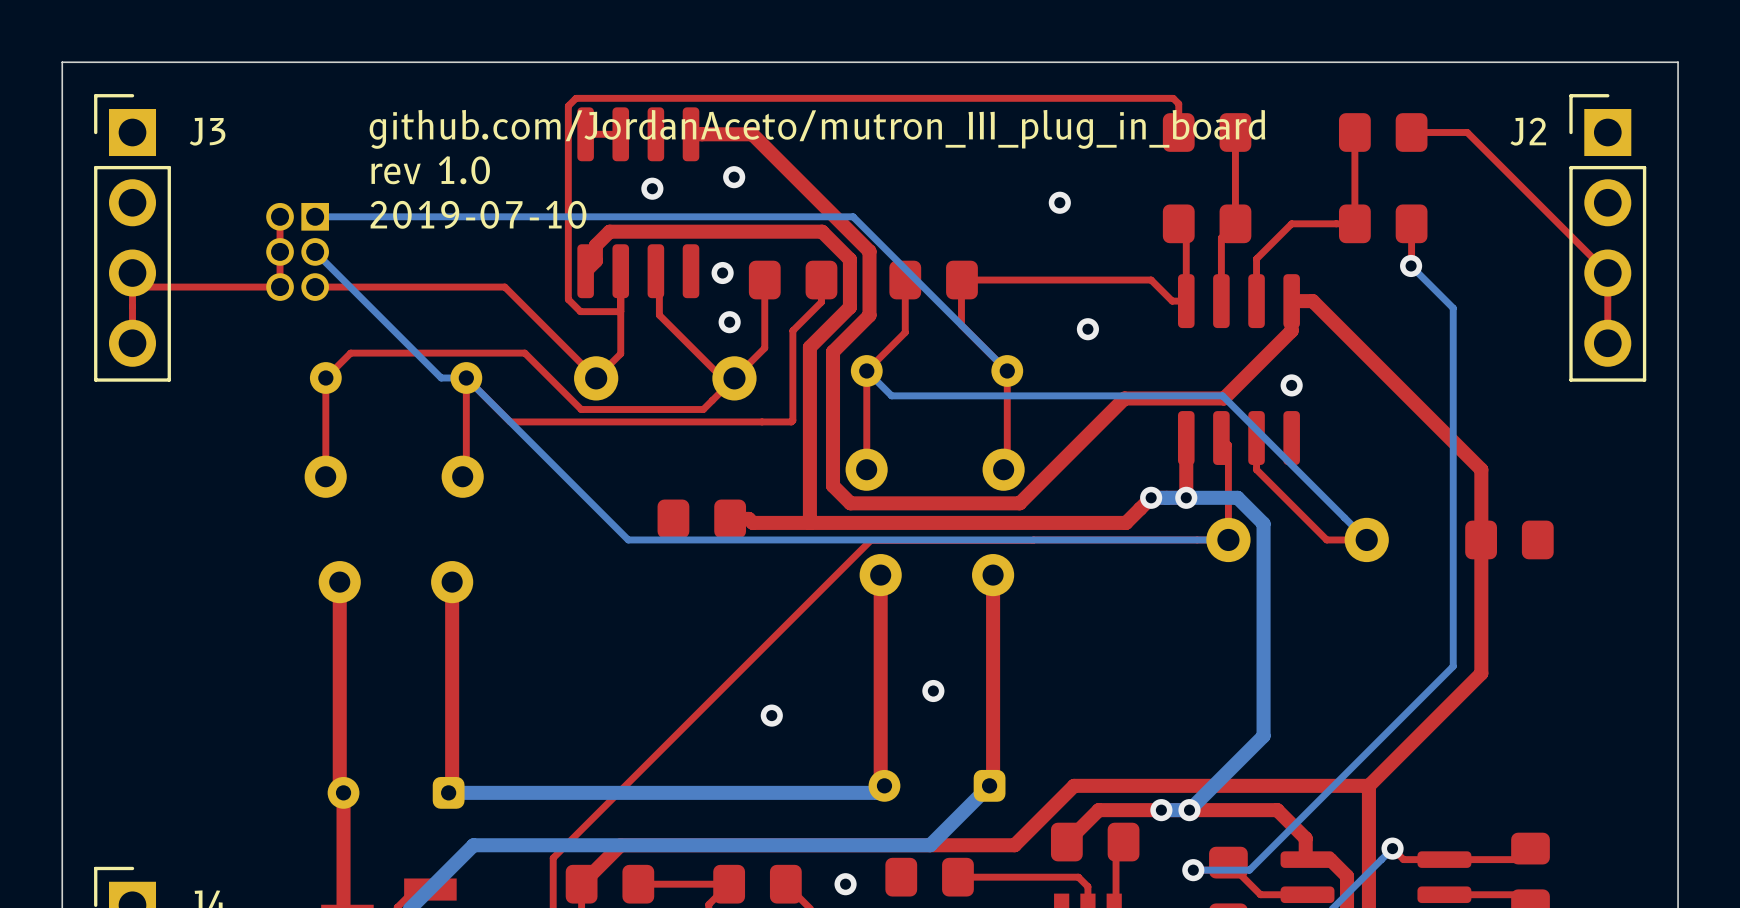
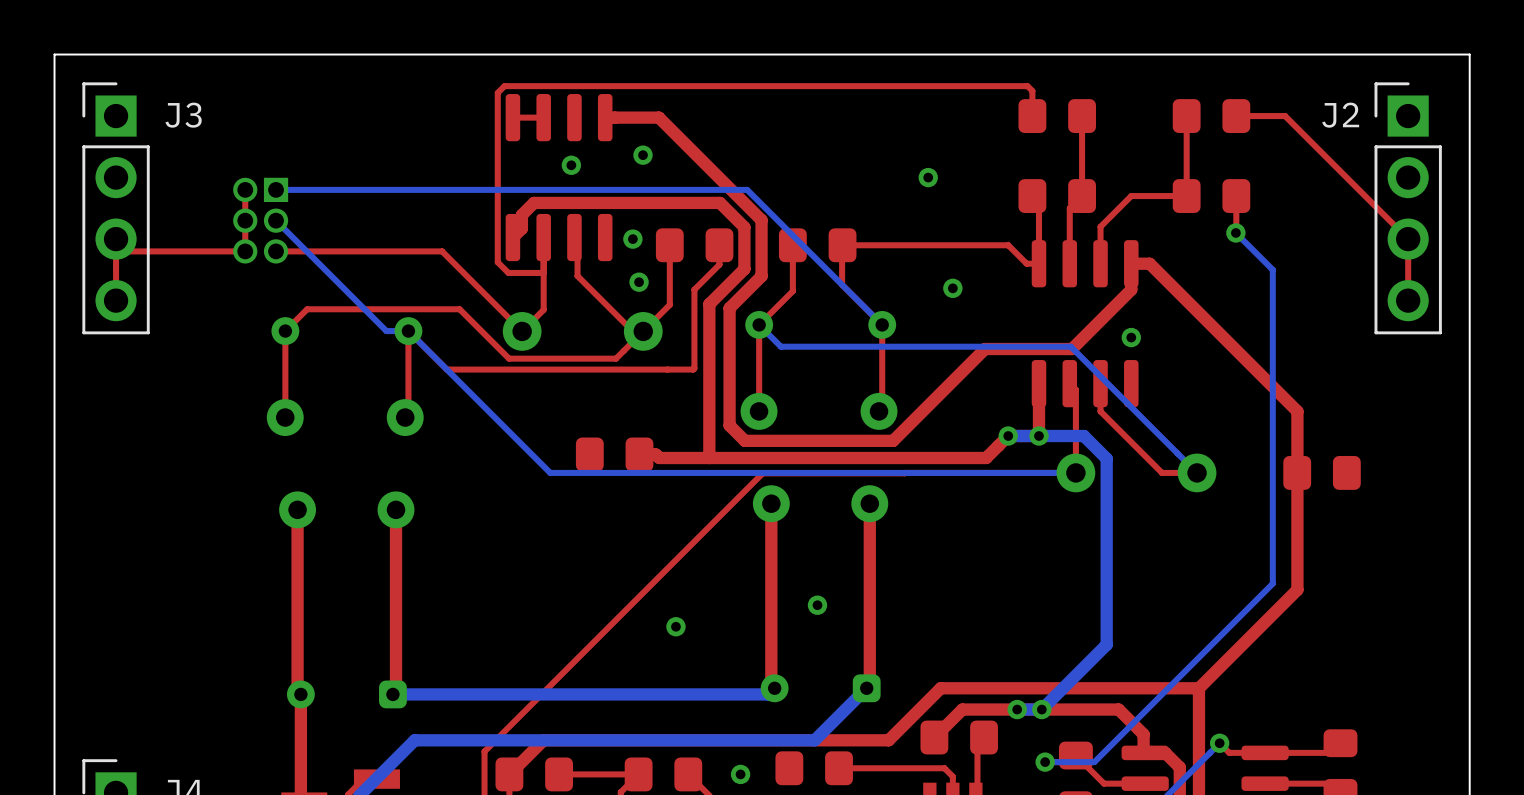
text: github.com/JordanAceto/mutron_III_plug_in_board (817, 129) -> none
text: rev 1.0 (430, 170) -> none
text: 2019-07-10 (478, 214) -> none

